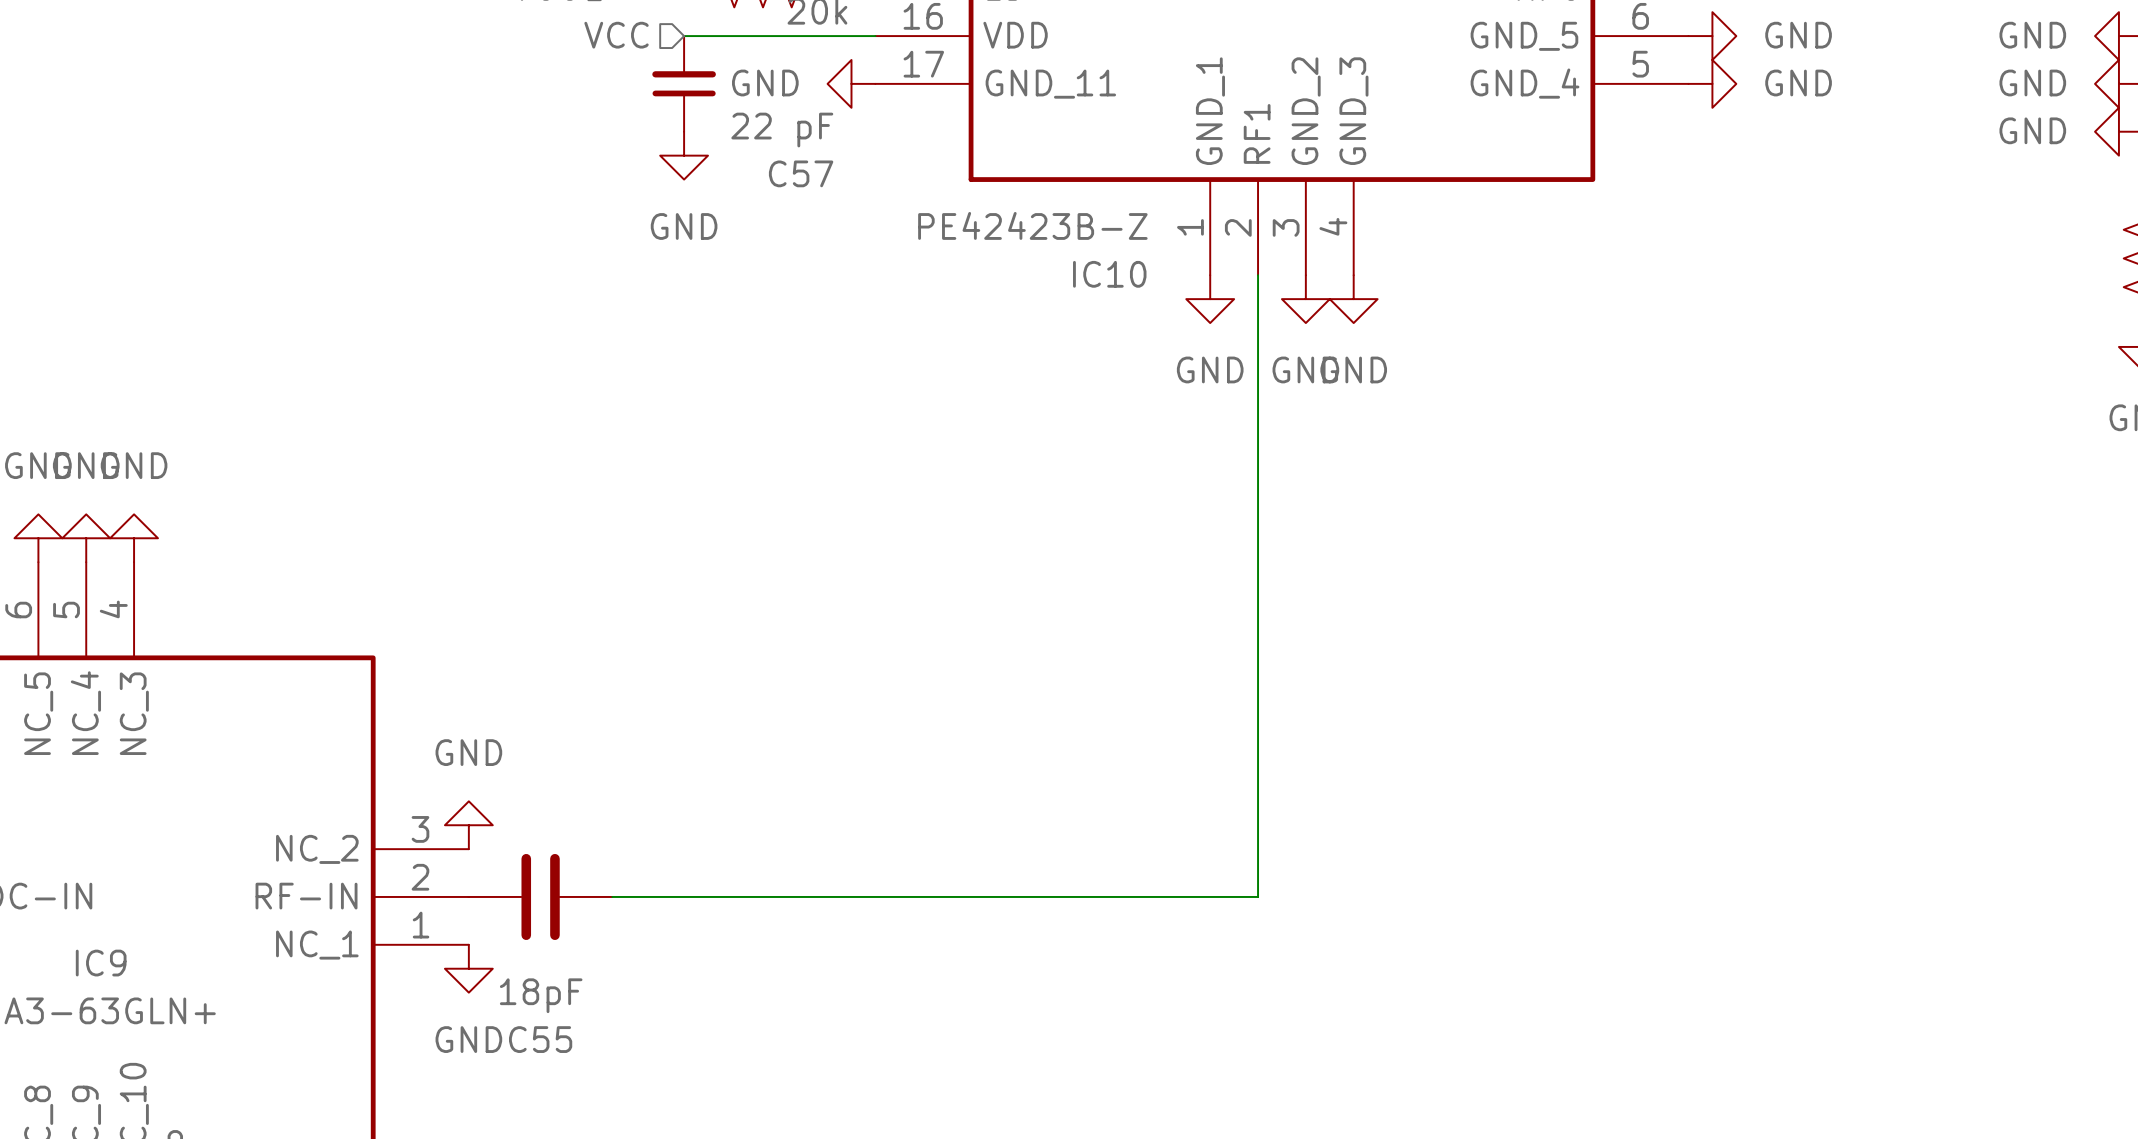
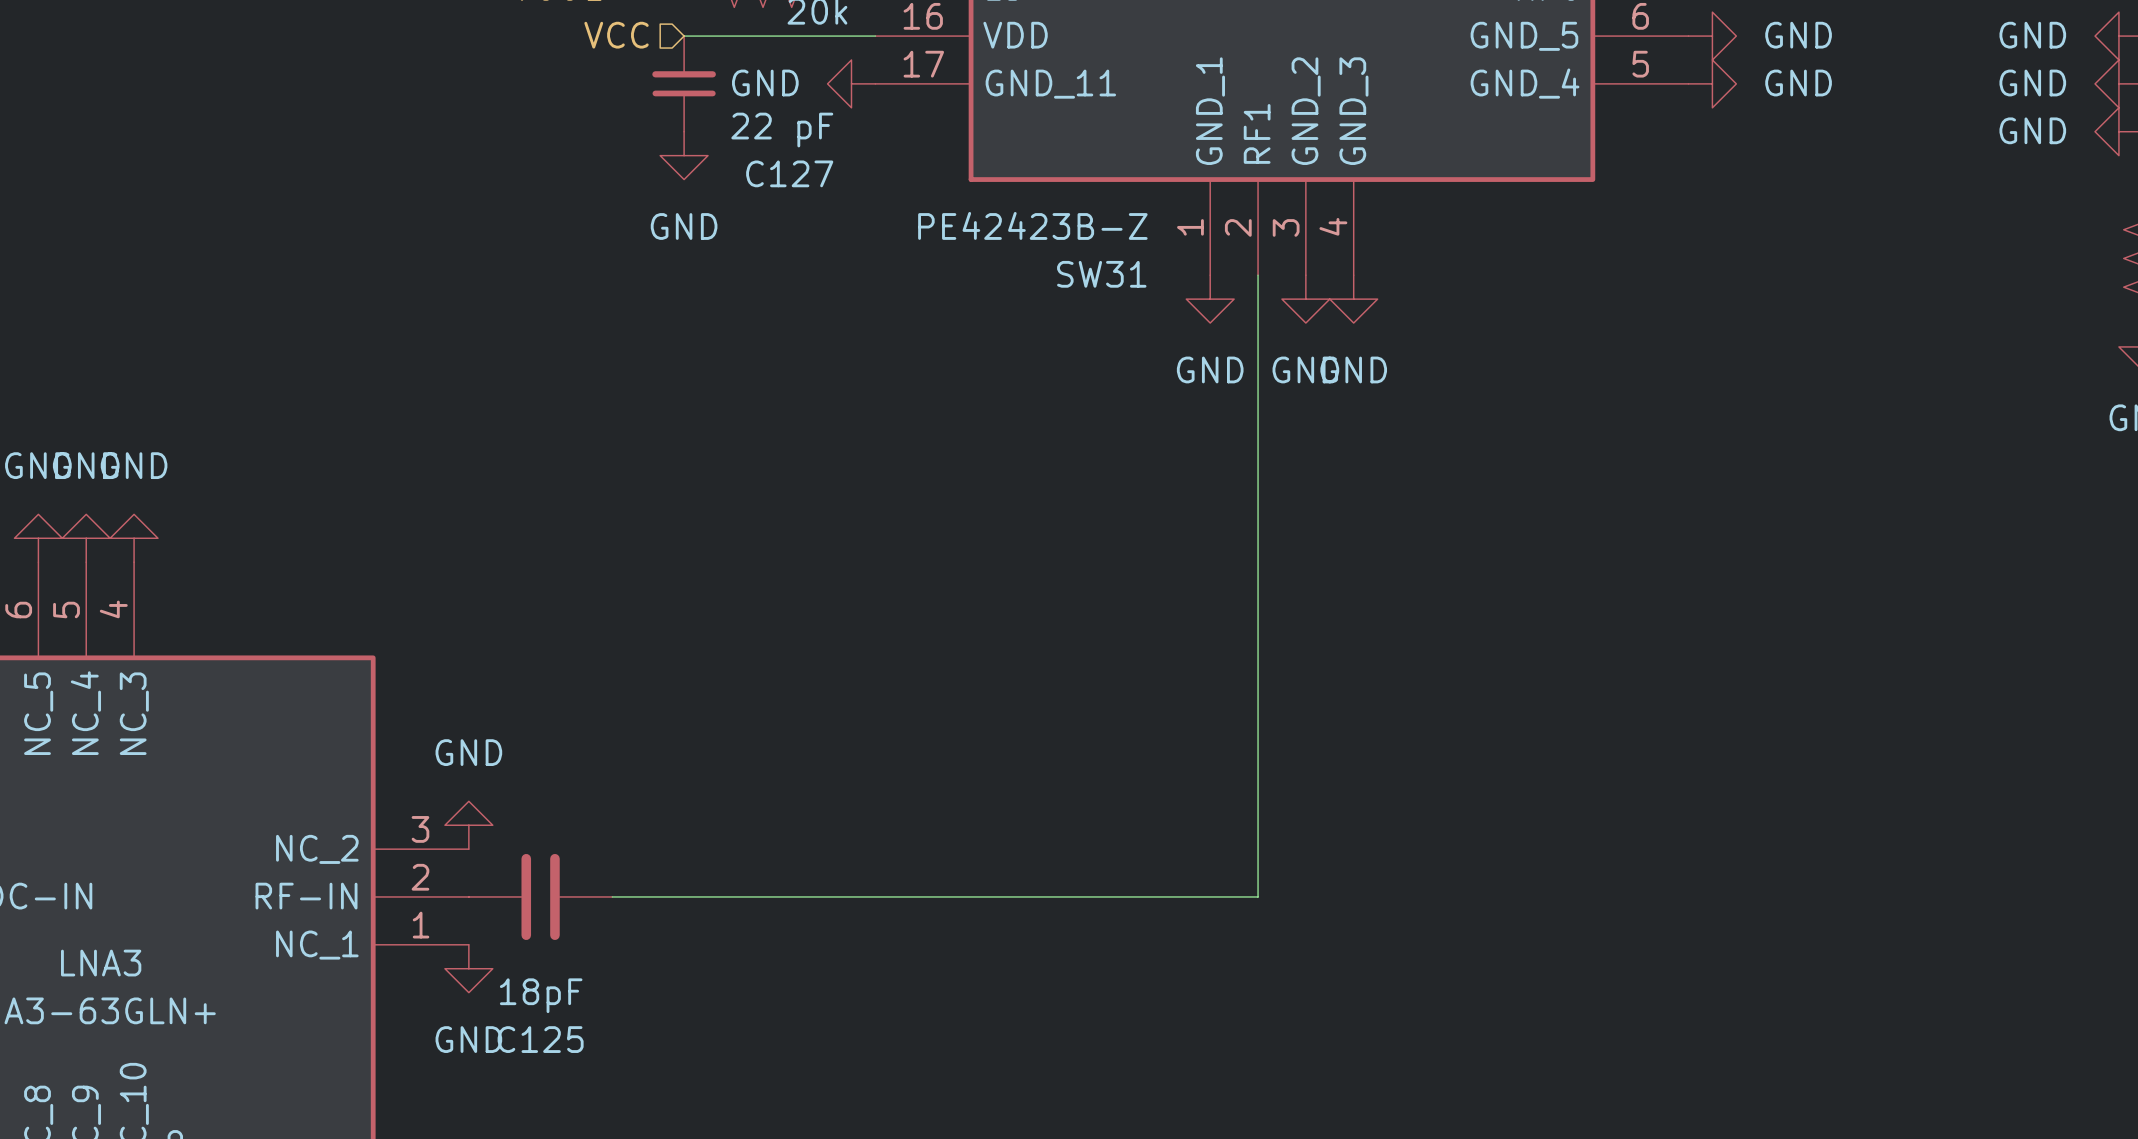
C57 name: C57 (801, 173) -> C127 (789, 173)
IC10 name: IC10 (1109, 274) -> SW31 (1101, 274)
IC9 name: IC9 (101, 963) -> LNA3 (101, 963)
C55 name: C55 (540, 1039) -> C125 (540, 1039)

